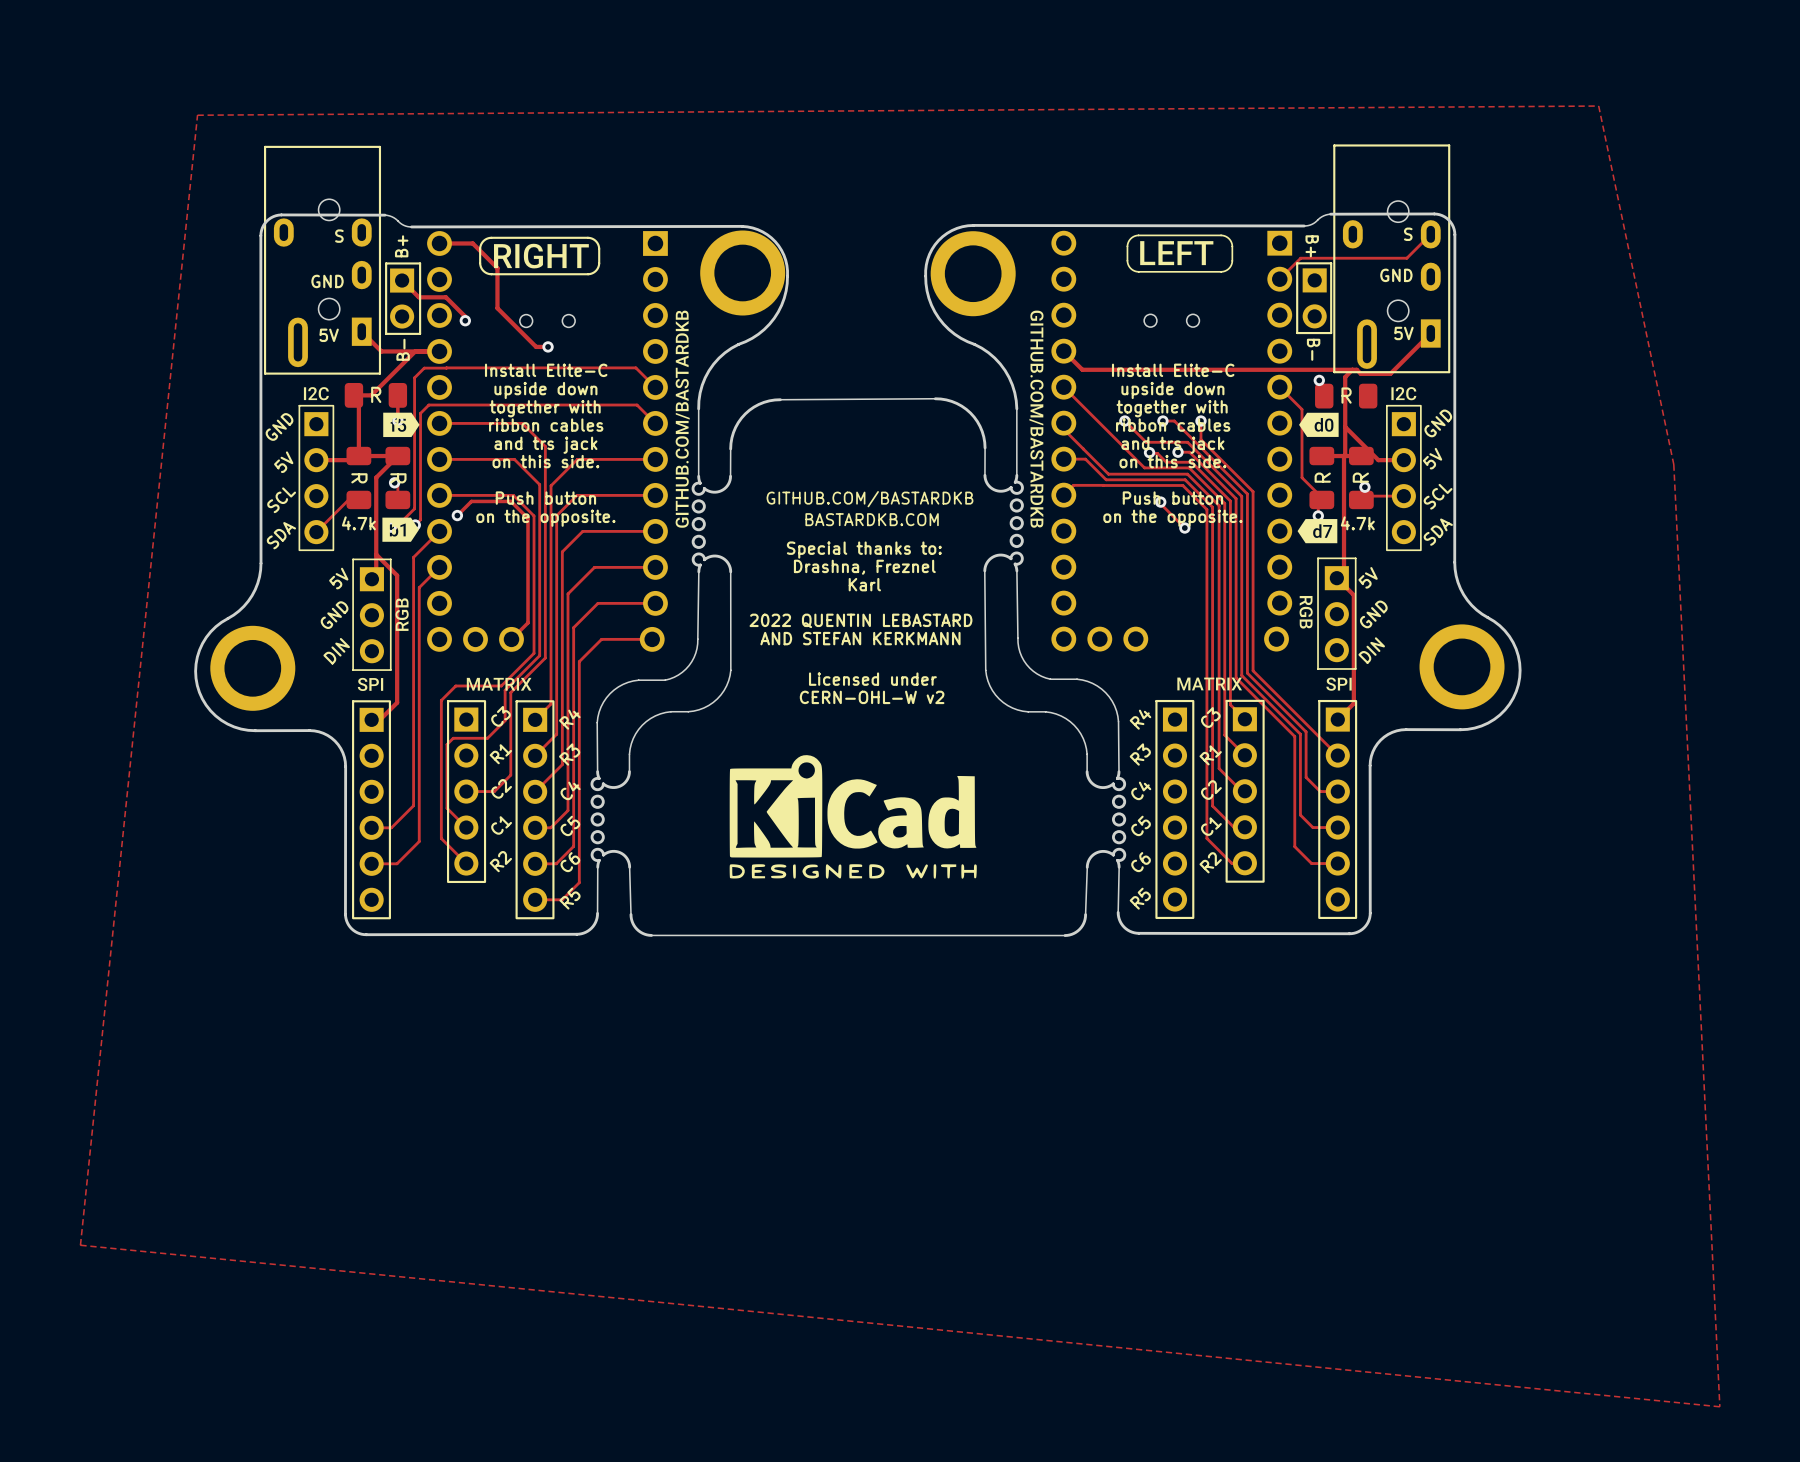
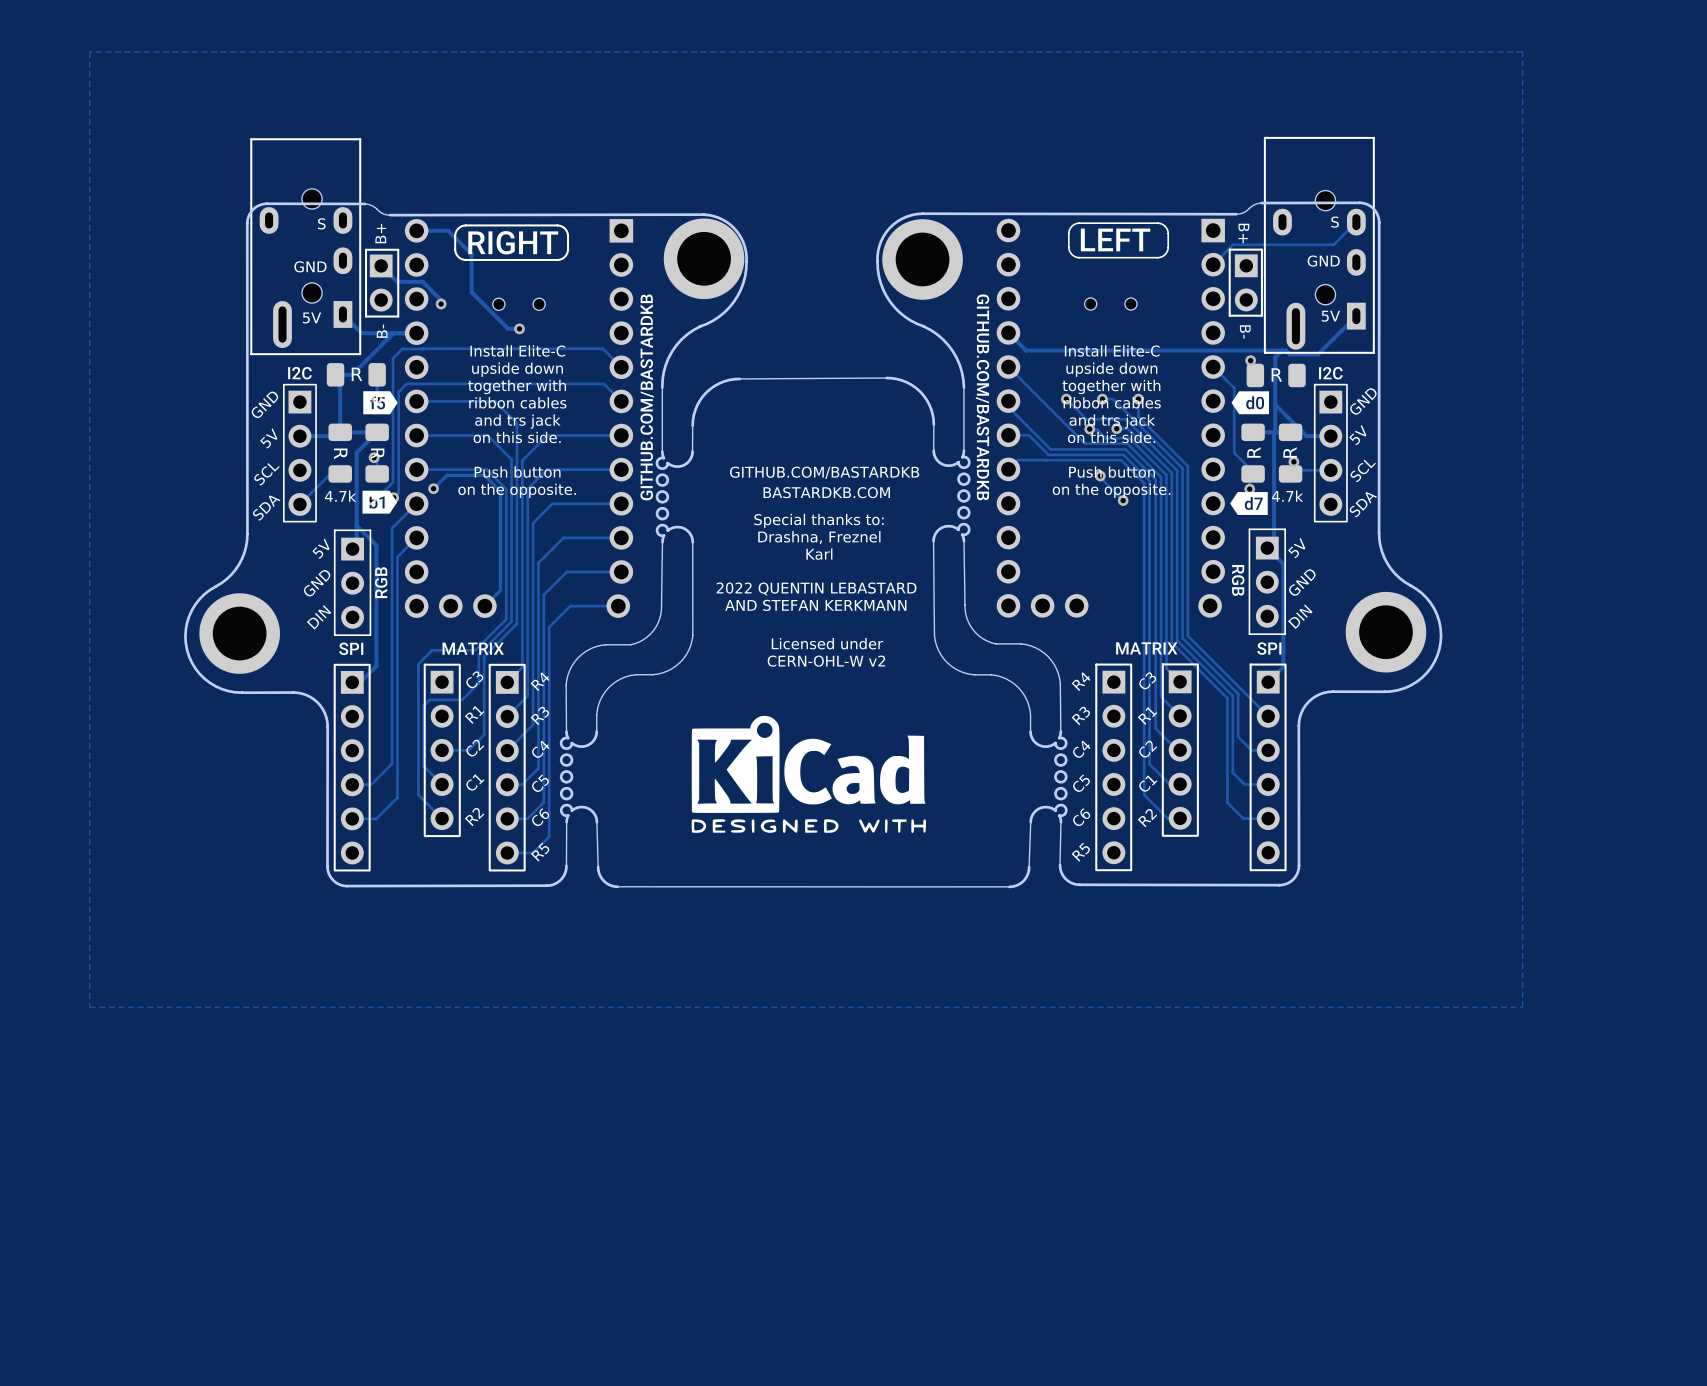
zone outline: (1598, 106) (1673, 464) (1719, 1406) (80, 1245) (197, 115) (1598, 106) -> (89, 51) (89, 1007) (1522, 1007) (1522, 51) (89, 51)

